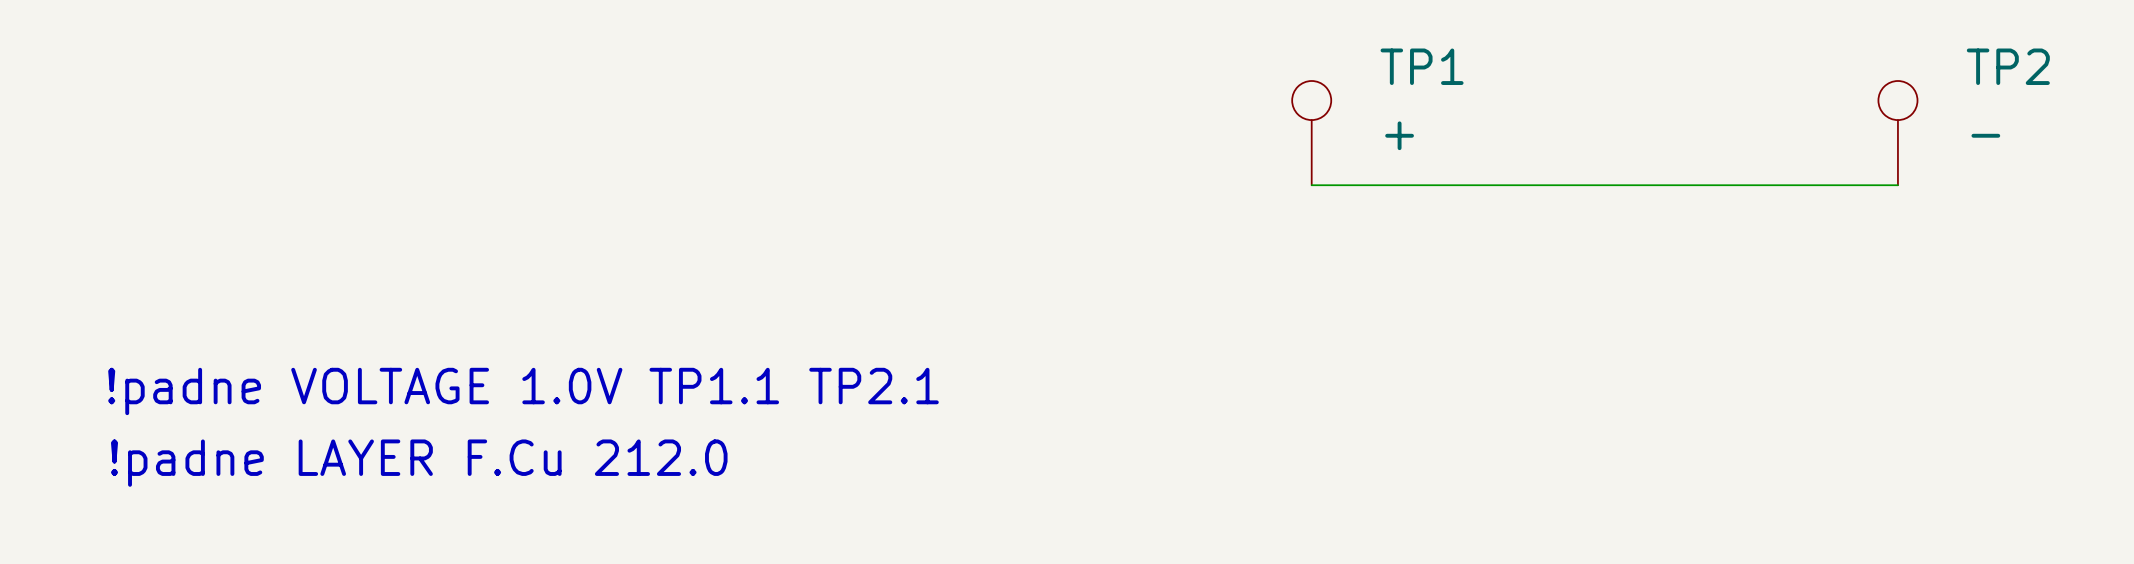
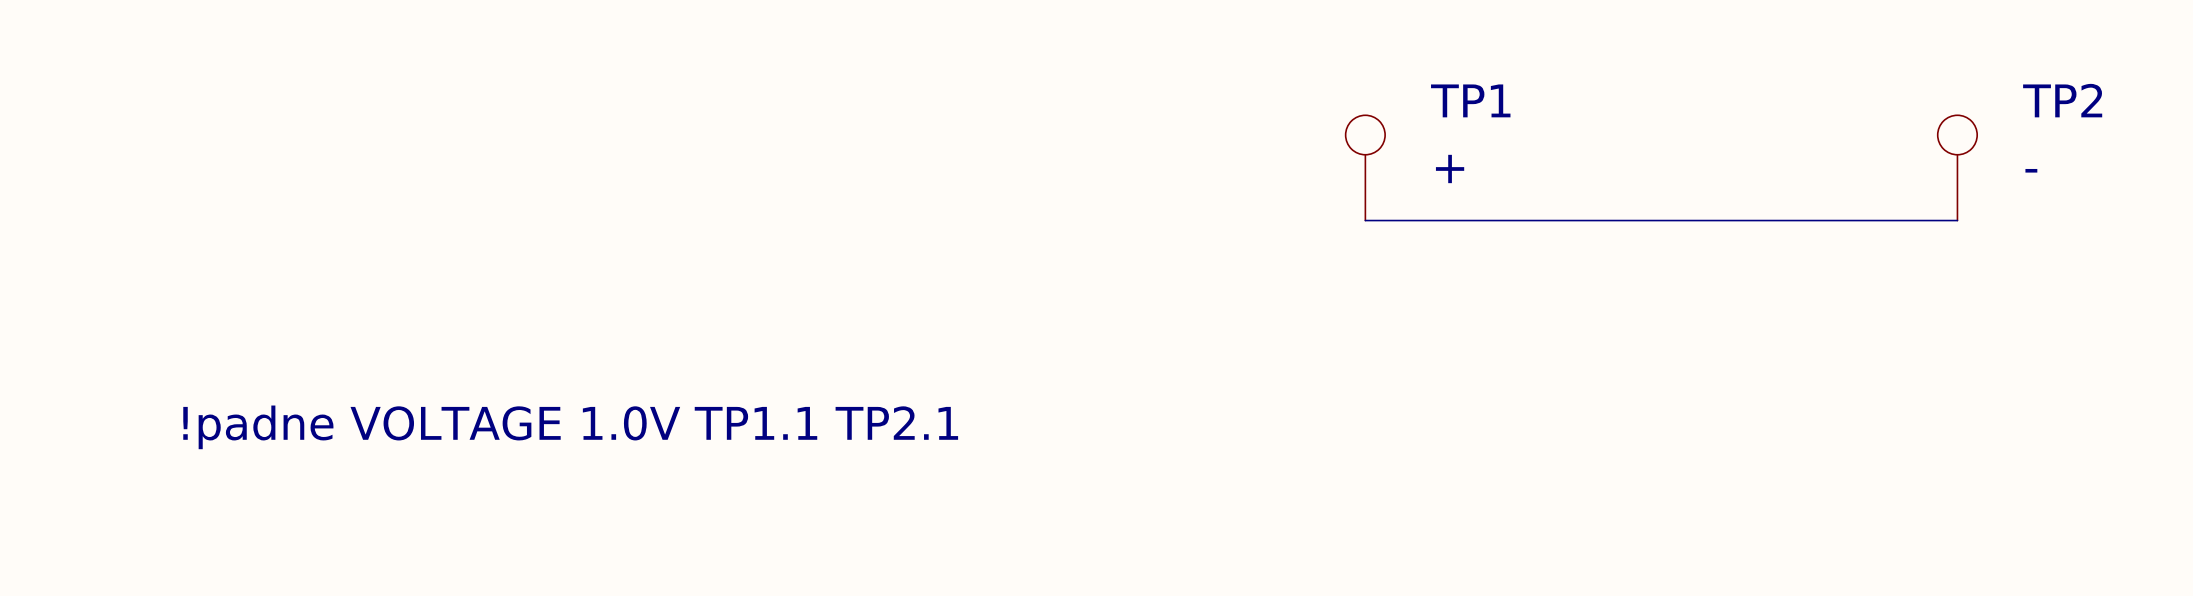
text: !padne LAYER F.Cu 212.0 (419, 463) -> none

